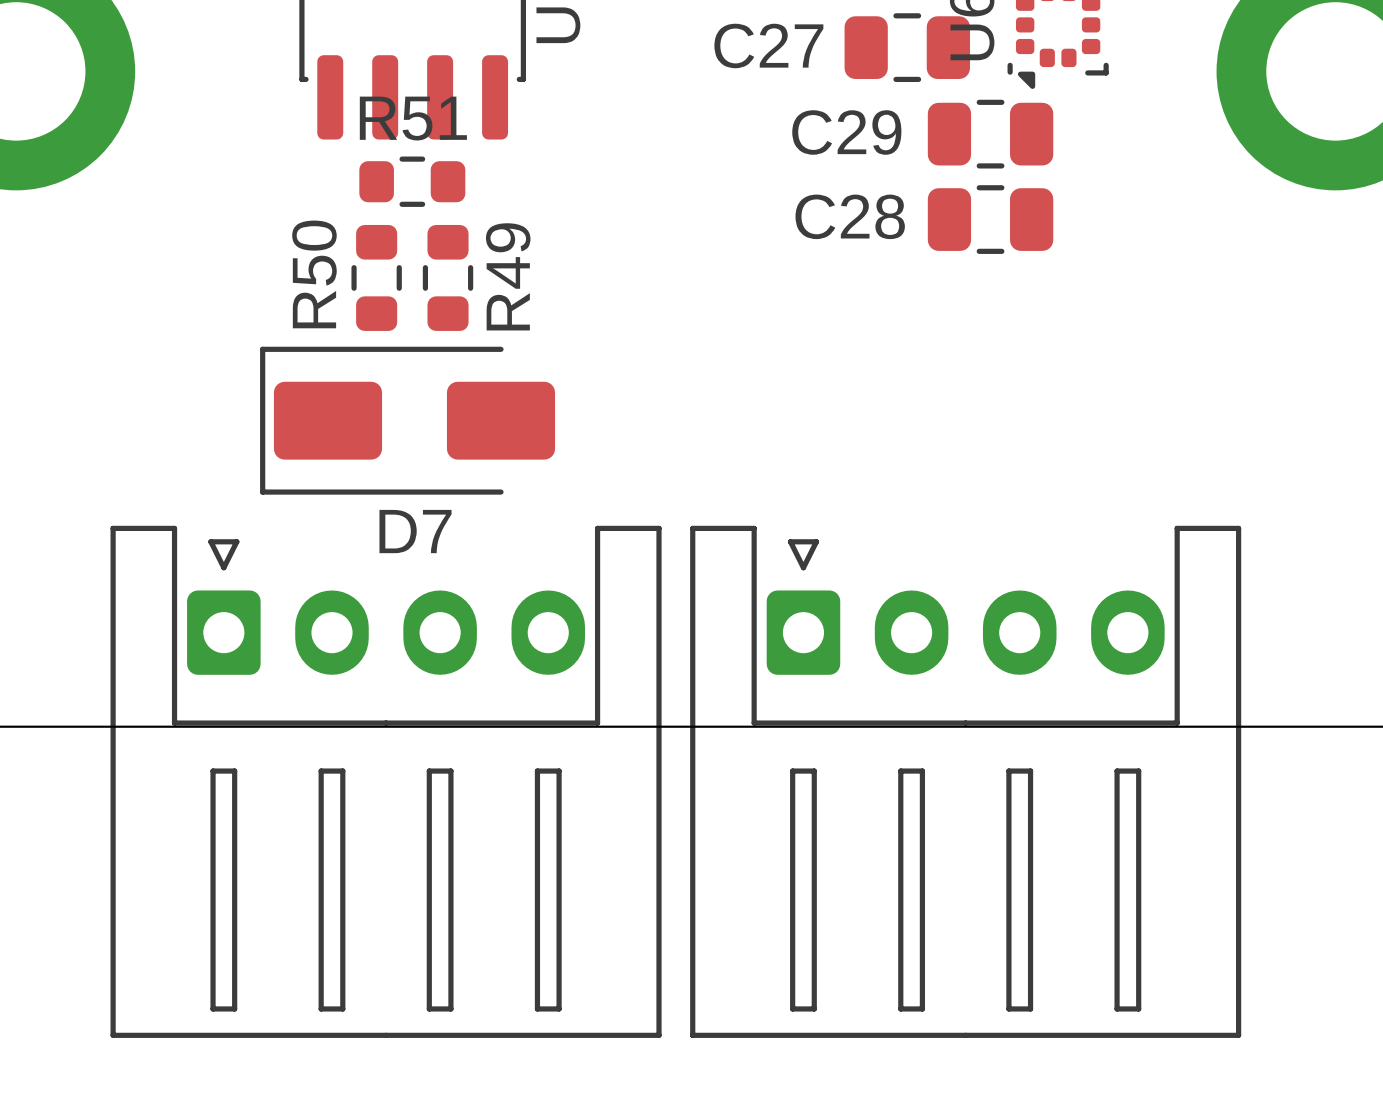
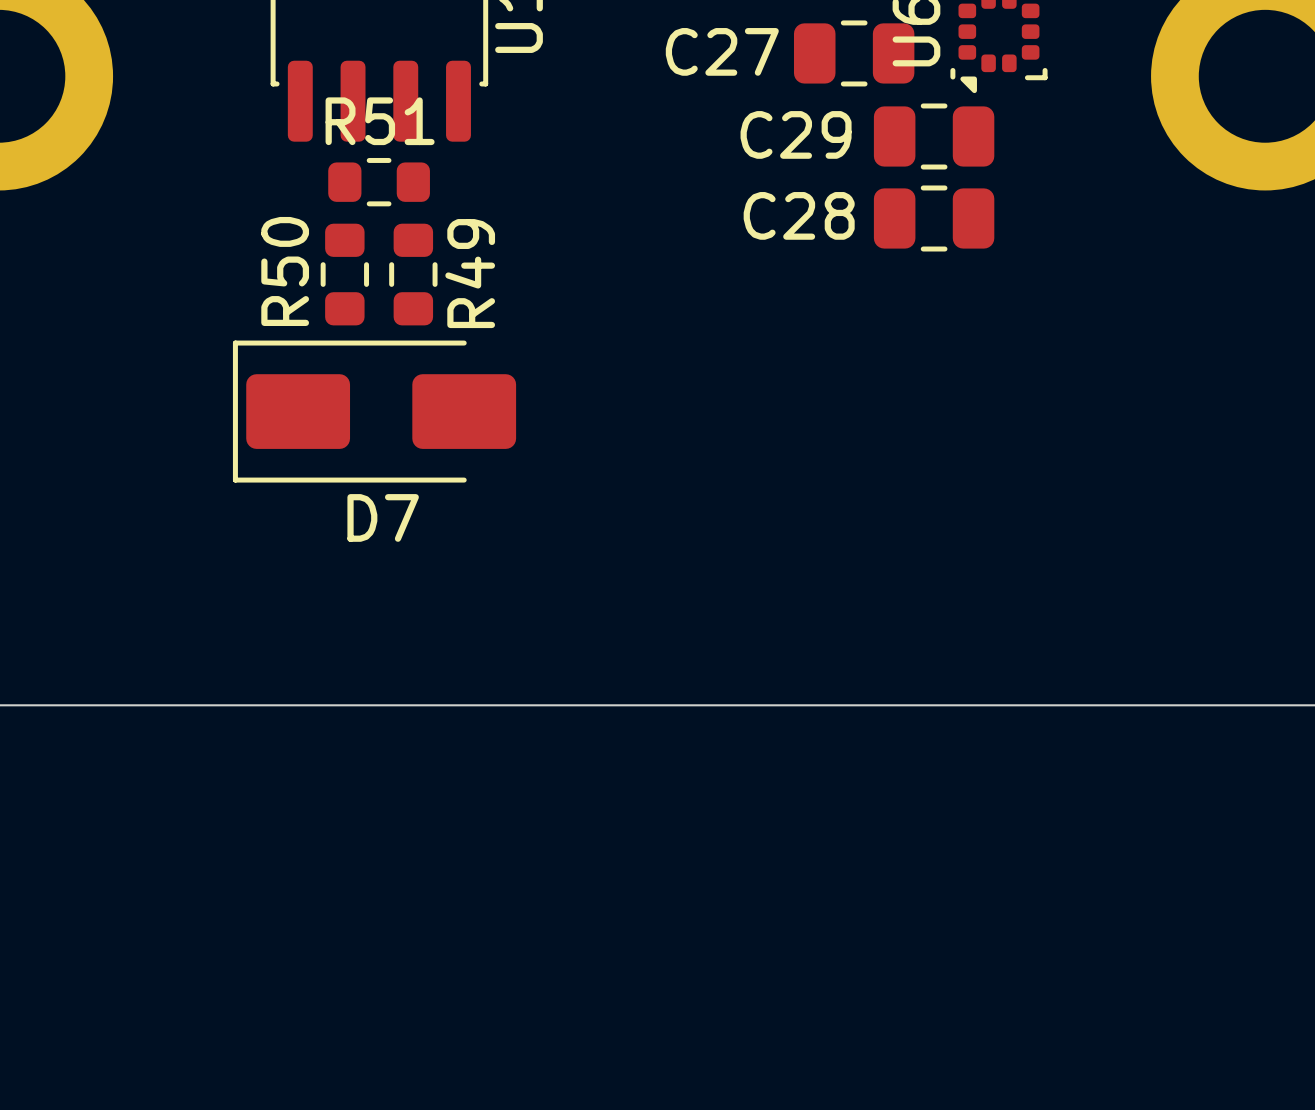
part: (386, 781) -> none
part: (965, 781) -> none

